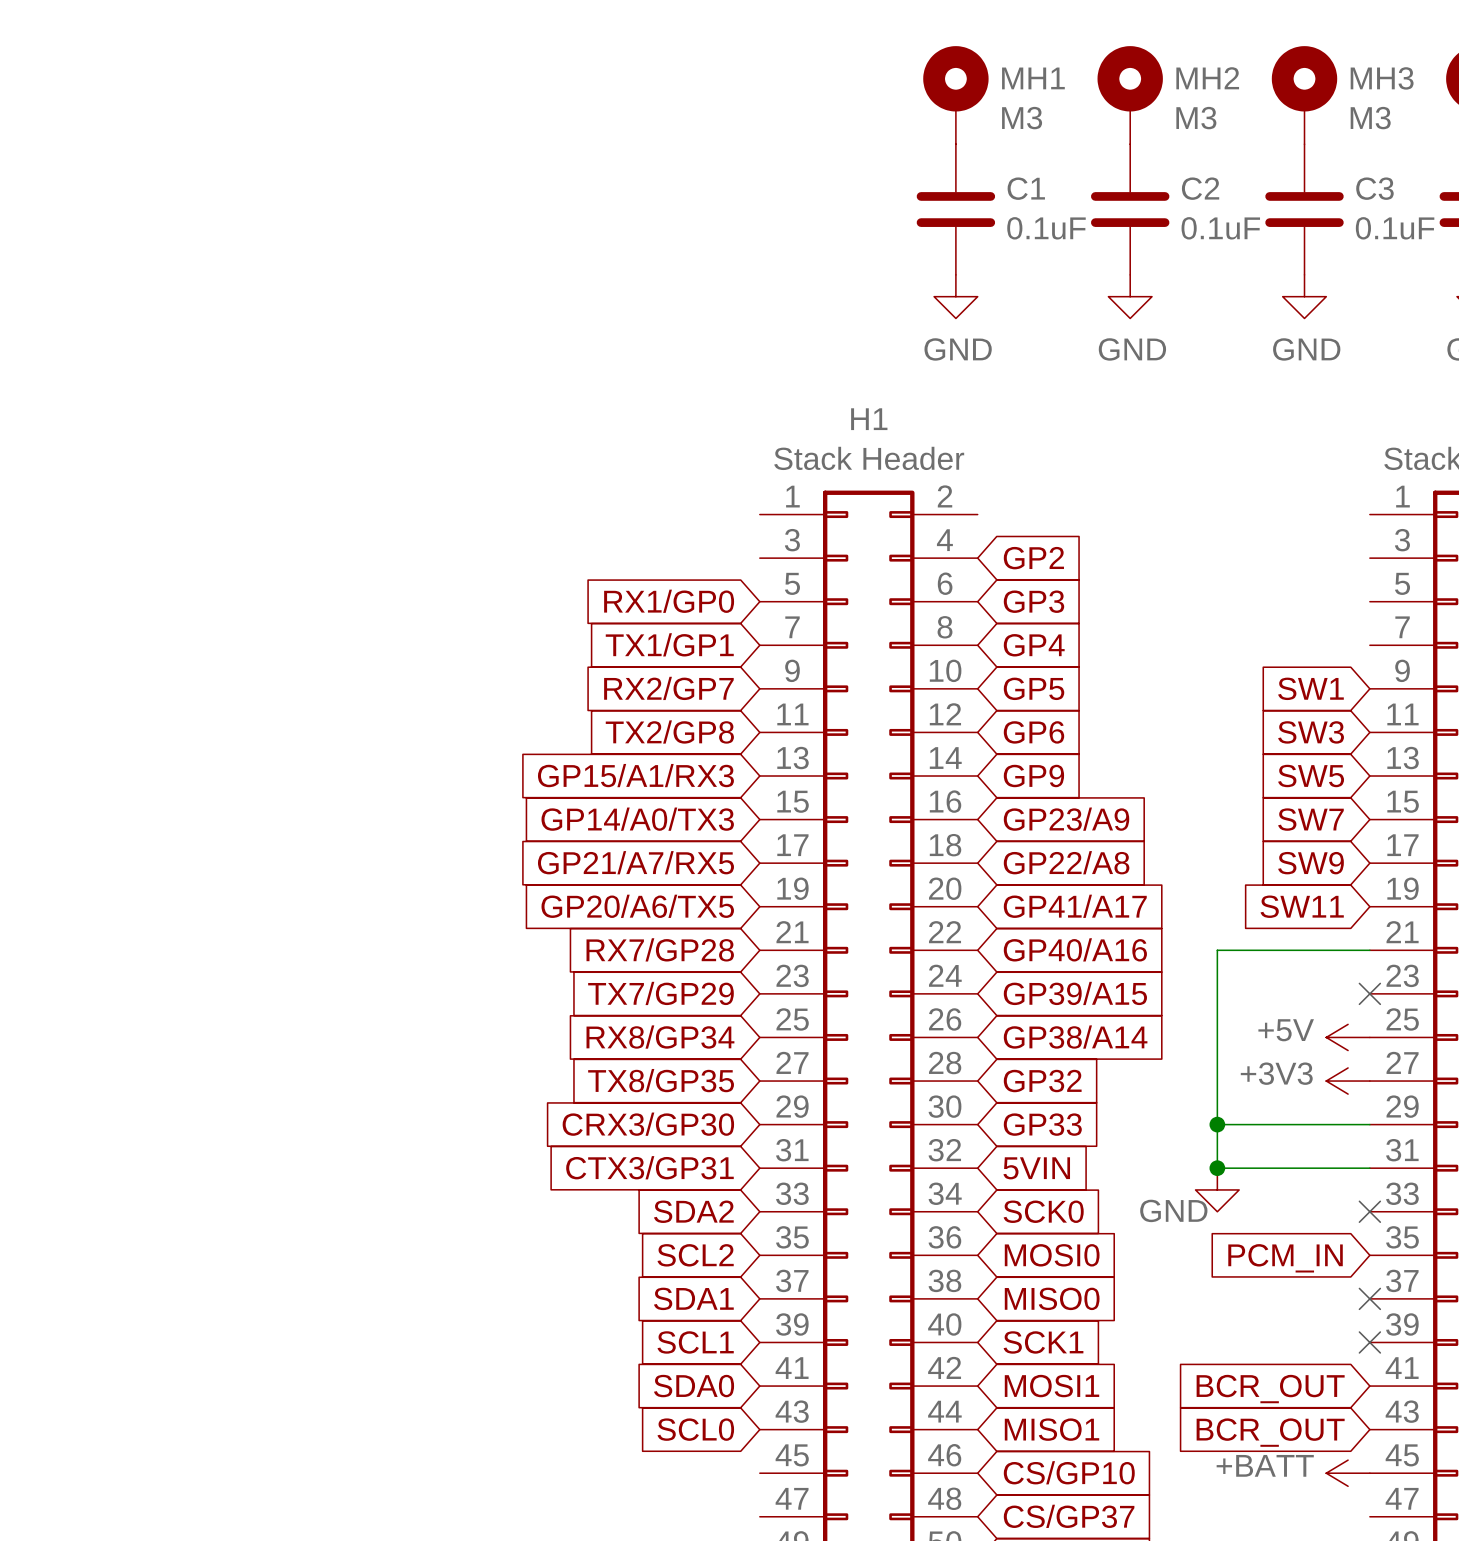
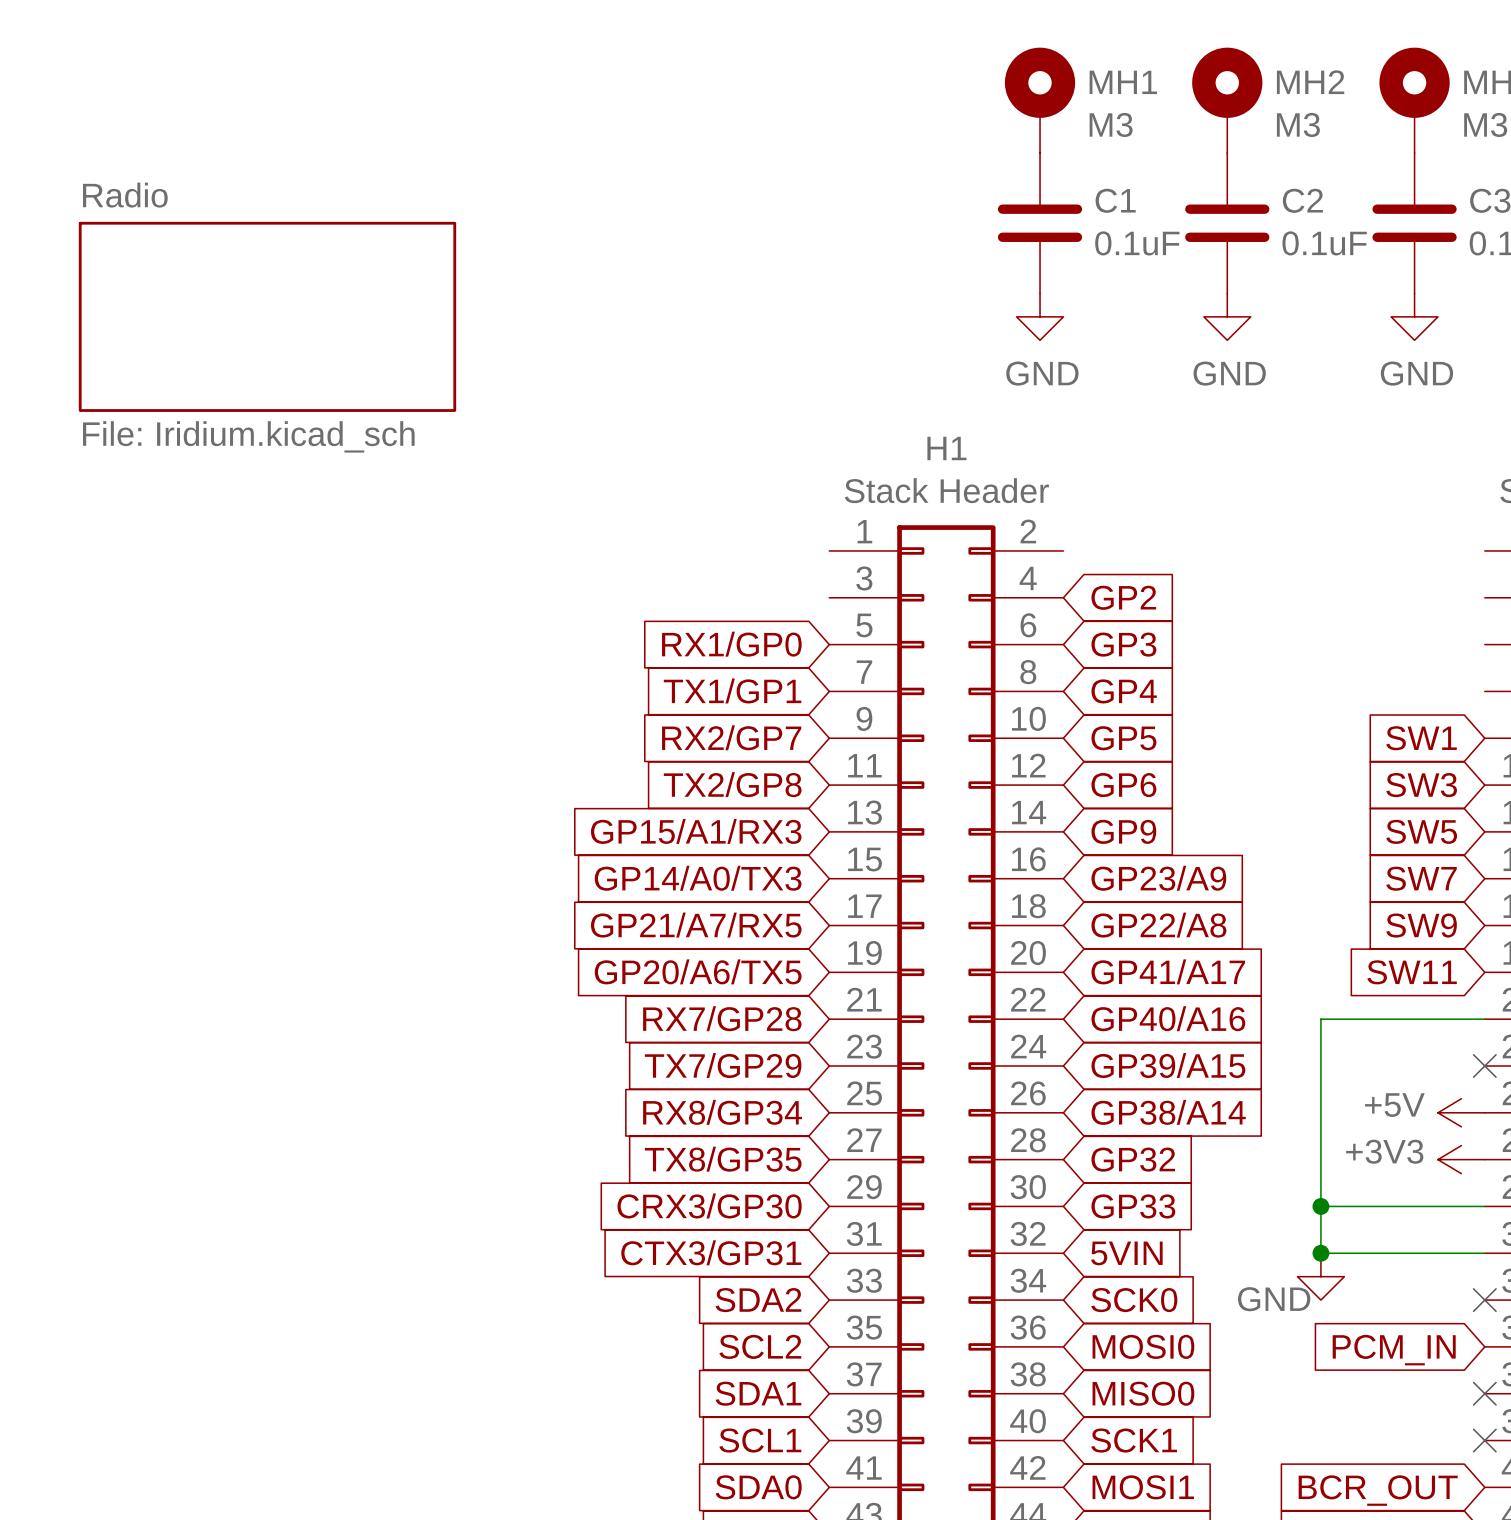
sheet Radio: none -> File: Iridium.kicad_sch (267, 316)

